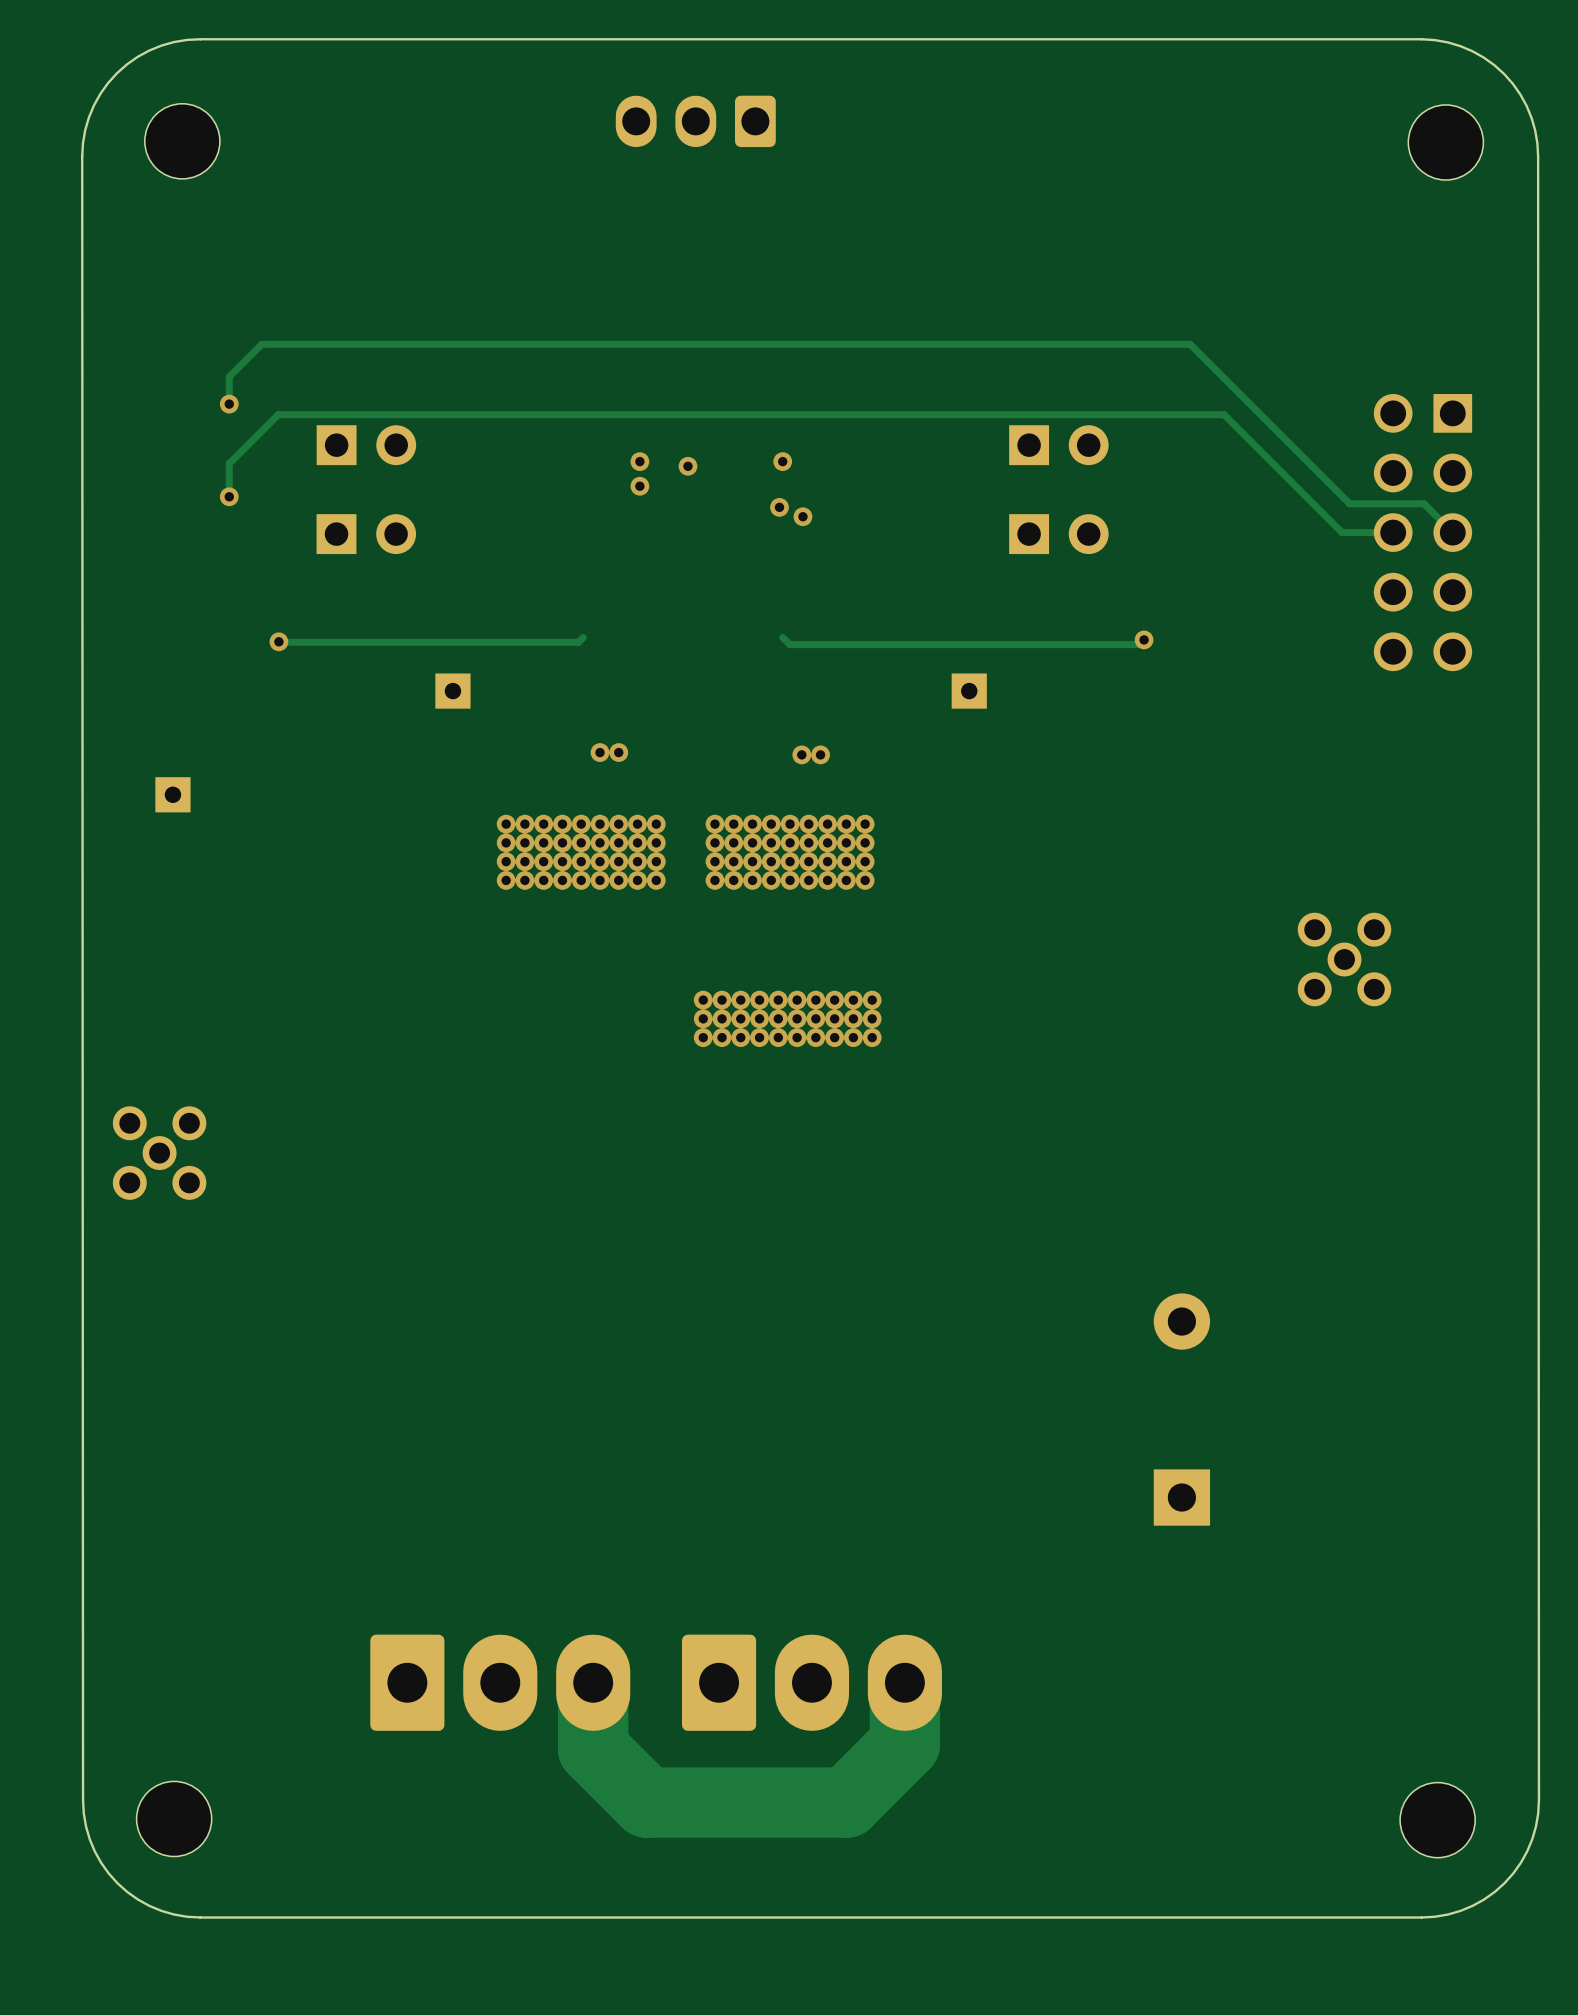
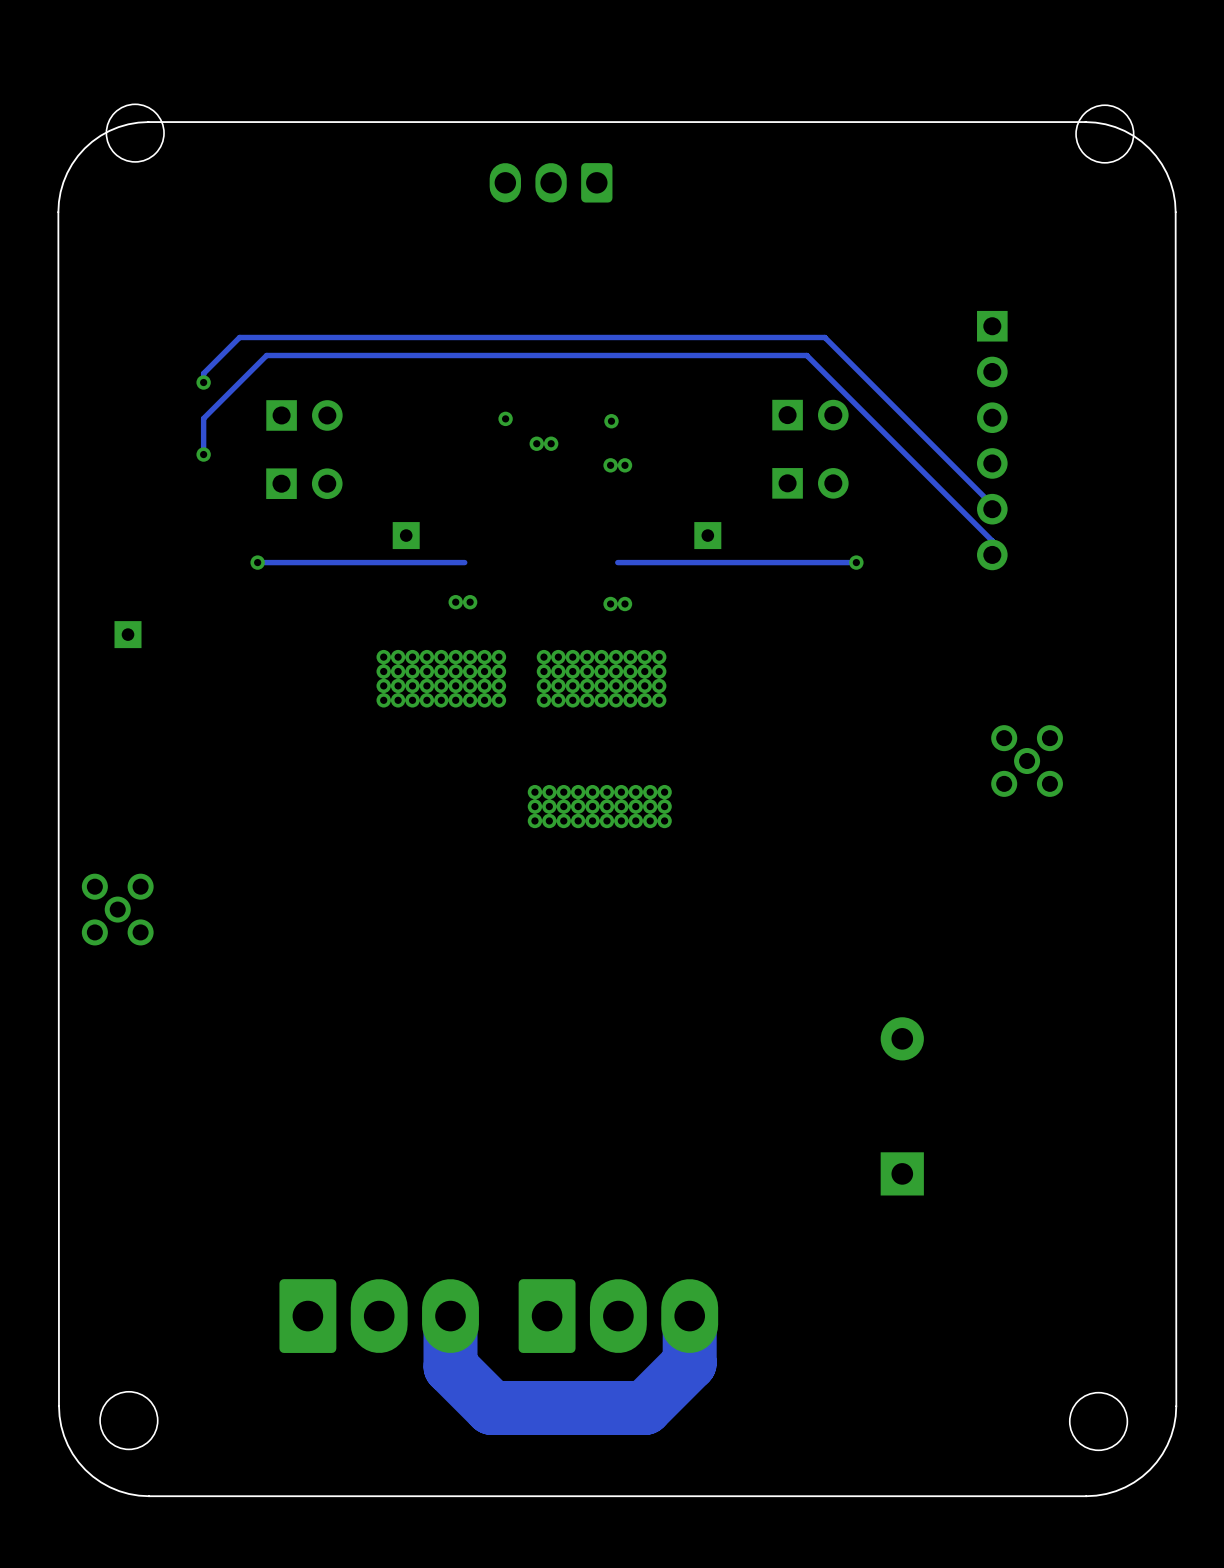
part position: (695, 121) -> (551, 182)
track: (229, 404) (229, 376) (261, 344) (1190, 344) (1349, 503) (1424, 503) (1452, 532) -> none
via: (229, 404) -> none
part: (366, 445) -> none
part: (1058, 445) -> none
via: (639, 461) -> none
via: (782, 461) -> none
track: none -> (203, 382) (203, 373) (239, 337) (824, 337) (992, 504) (992, 509)
via: none -> (203, 382)
via: (687, 466) -> none
via: (639, 486) -> none
track: (229, 496) (229, 463) (278, 414) (1224, 414) (1342, 532) (1393, 532) -> none
via: (229, 496) -> none
via: (779, 507) -> none
part: none -> (304, 415)
via: none -> (505, 418)
part: (1422, 532) -> none
part: (366, 534) -> none
part position: (1058, 534) -> (810, 415)
part: none -> (992, 440)
via: none -> (536, 443)
via: none -> (551, 443)
track: none -> (203, 454) (203, 418) (266, 355) (806, 355) (992, 540) (992, 554)
via: none -> (203, 454)
via: none -> (610, 465)
via: none -> (624, 465)
part: none -> (810, 483)
part: none -> (304, 483)
track: (583, 637) (578, 642) (278, 641) -> none
track: (782, 637) (789, 644) (1139, 644) (1144, 639) -> none
via position: (1144, 639) -> (856, 562)
via: (278, 641) -> none
part position: (452, 691) -> (406, 535)
part position: (969, 691) -> (707, 535)
via: none -> (257, 562)
track: none -> (464, 562) (257, 562)
track: none -> (856, 562) (617, 562)
board edge: (1538, 1800) (1537, 143) (1526, 105) (1512, 83) (1494, 65) (1460, 46) (1421, 39) (200, 39) (174, 42) (149, 50) (126, 64) (108, 83) (88, 117) (82, 156) (83, 1800) -> (1176, 1406) (1175, 202) (1166, 173) (1149, 148) (1124, 130) (1105, 124) (1085, 122) (148, 122) (128, 124) (109, 130) (92, 141) (78, 155) (63, 182) (58, 212) (59, 1406)

